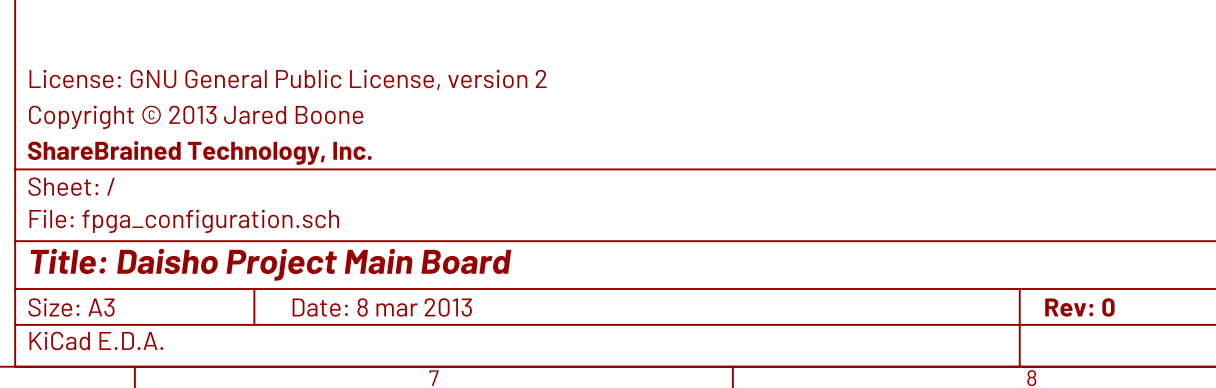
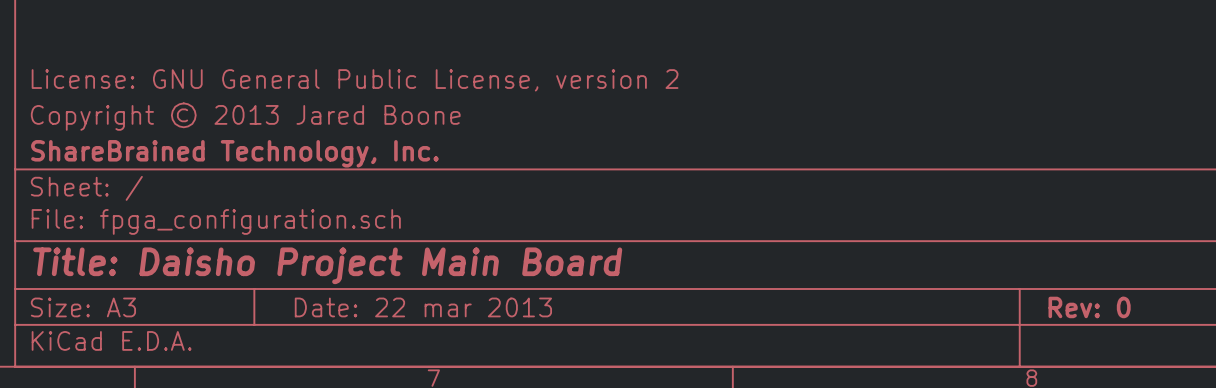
title block: Date: 8 mar 2013 (382, 307) -> Date: 22 mar 2013 (423, 307)

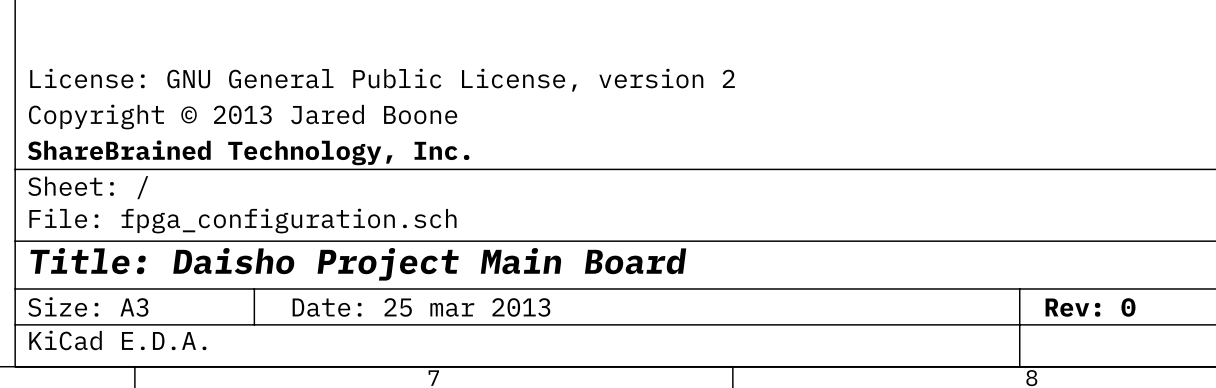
title block: Date: 22 mar 2013 (423, 307) -> Date: 25 mar 2013 (421, 307)

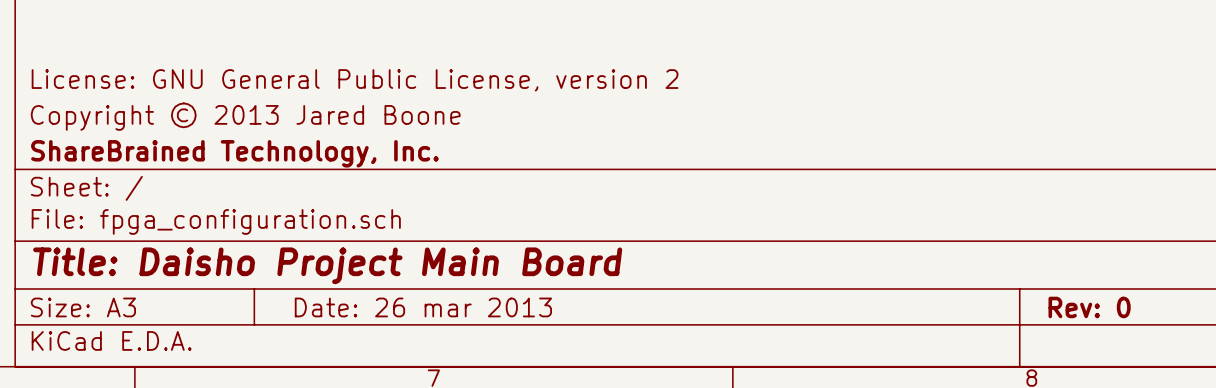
title block: Date: 25 mar 2013 (421, 307) -> Date: 26 mar 2013 (423, 307)

